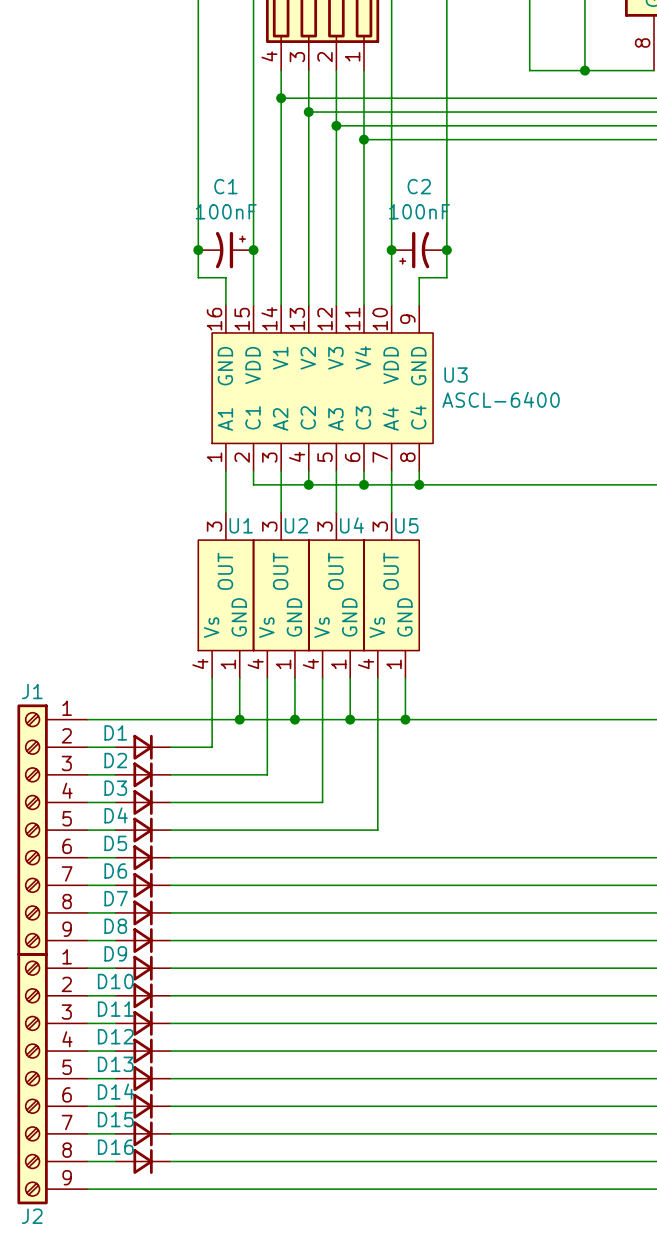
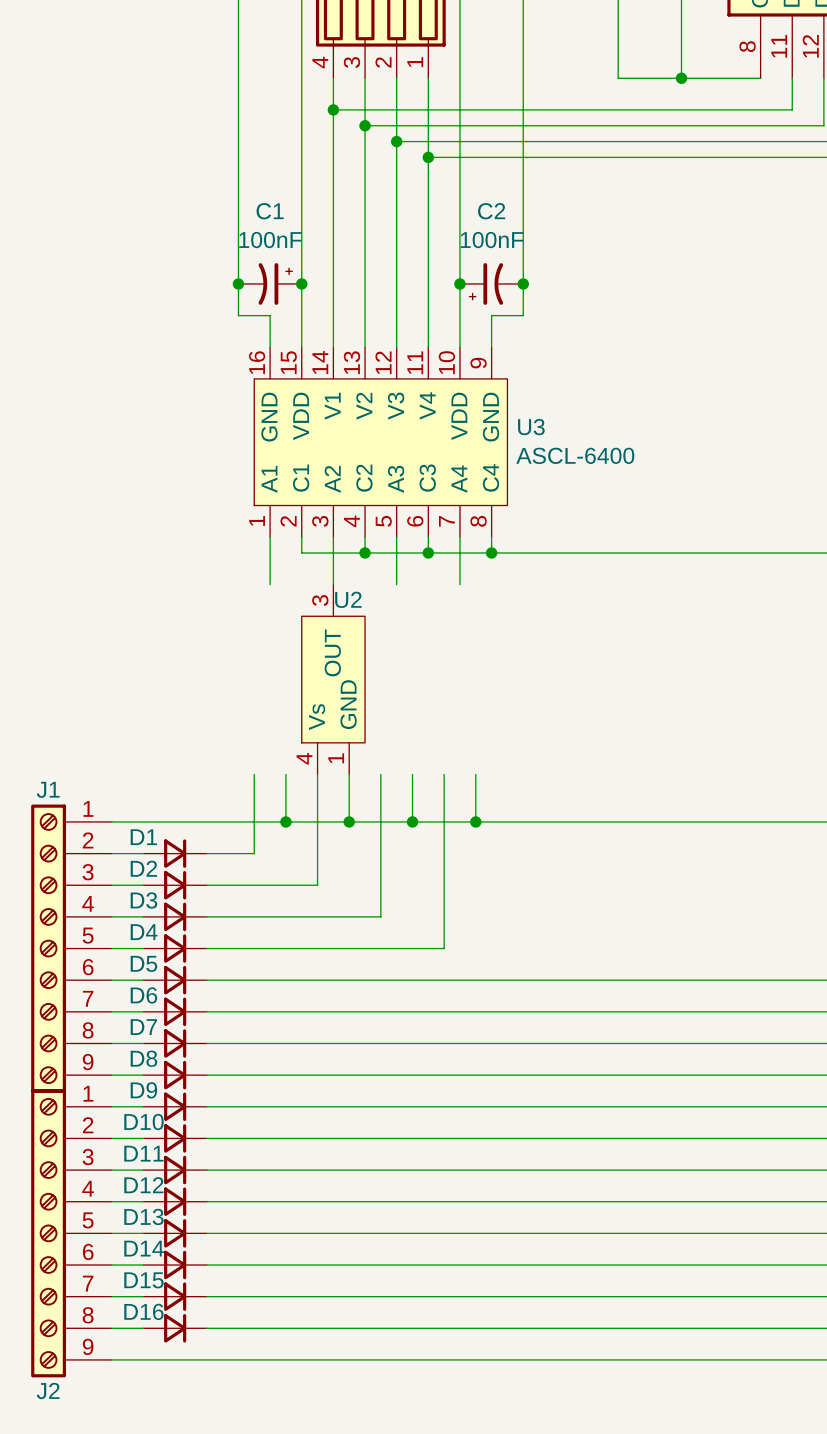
U1: (225, 595) -> none
U4: (336, 595) -> none
U5: (391, 595) -> none

